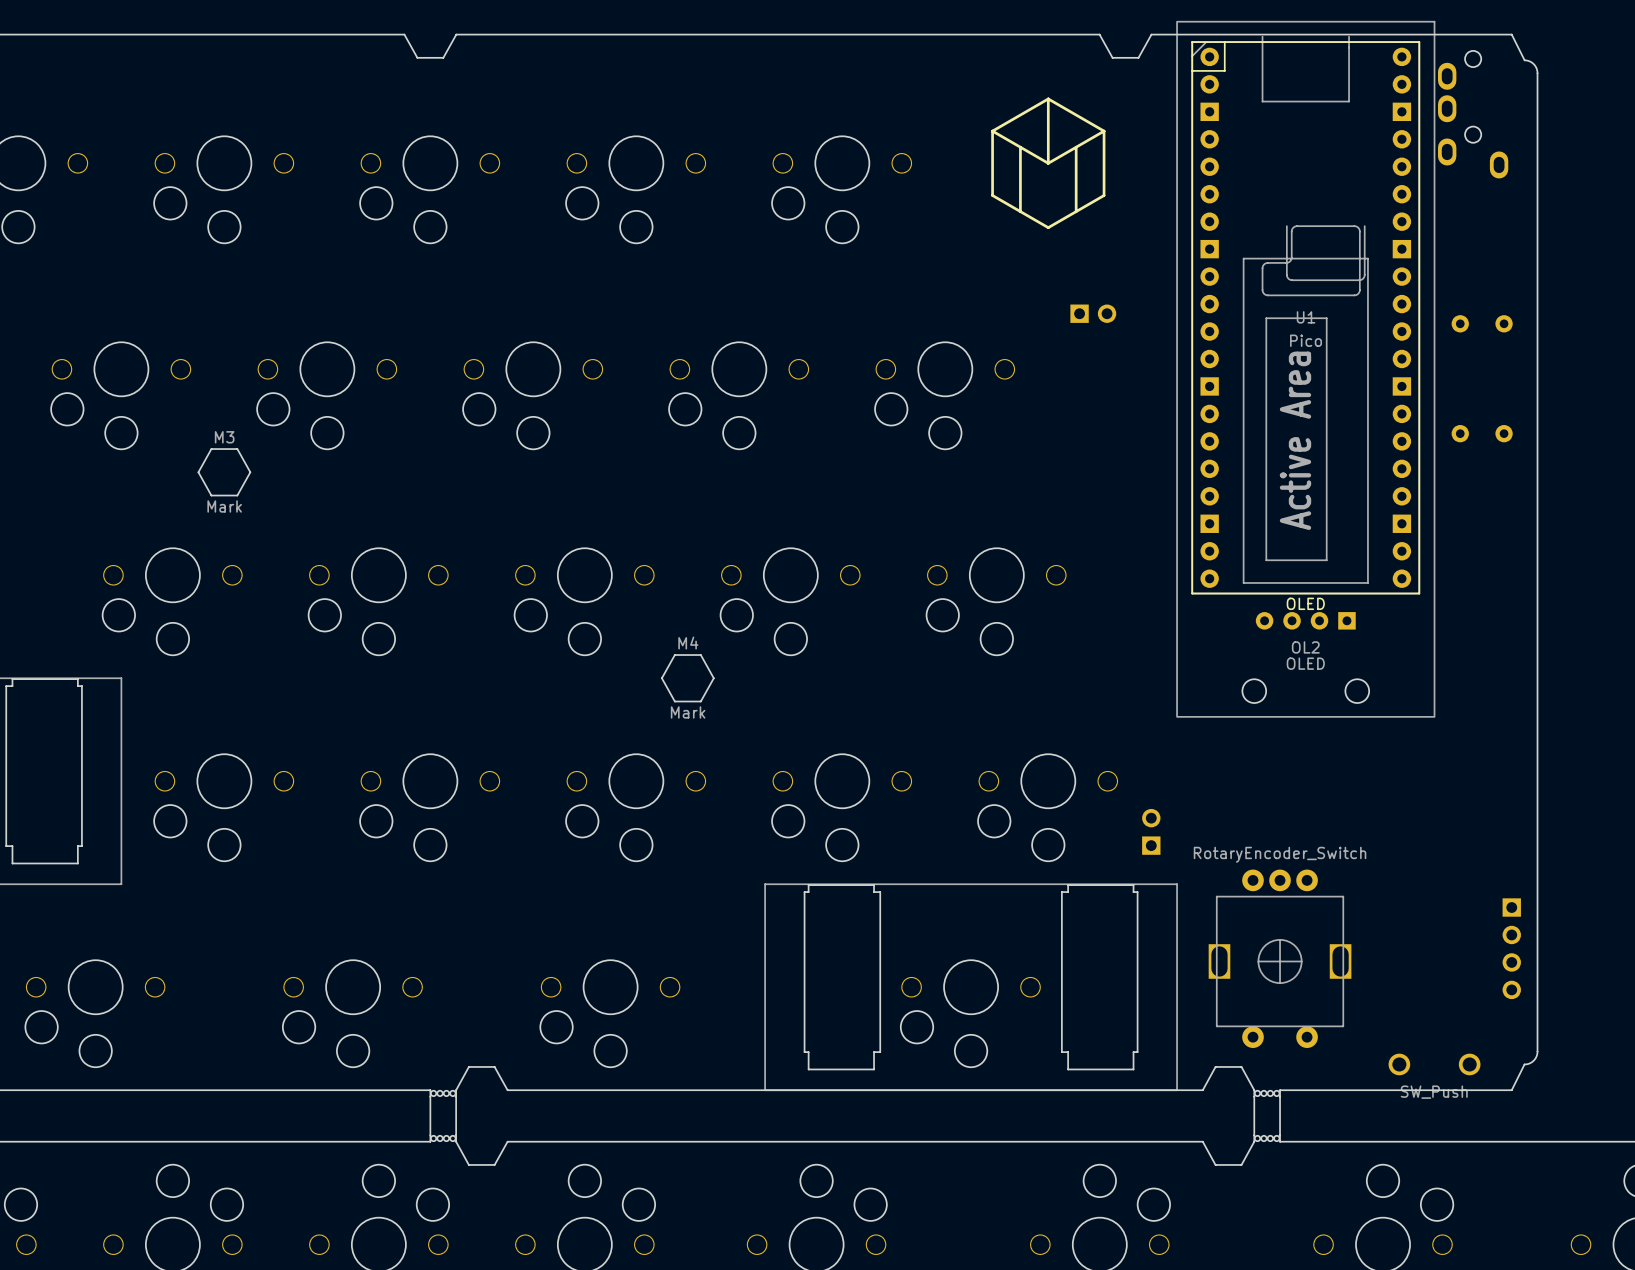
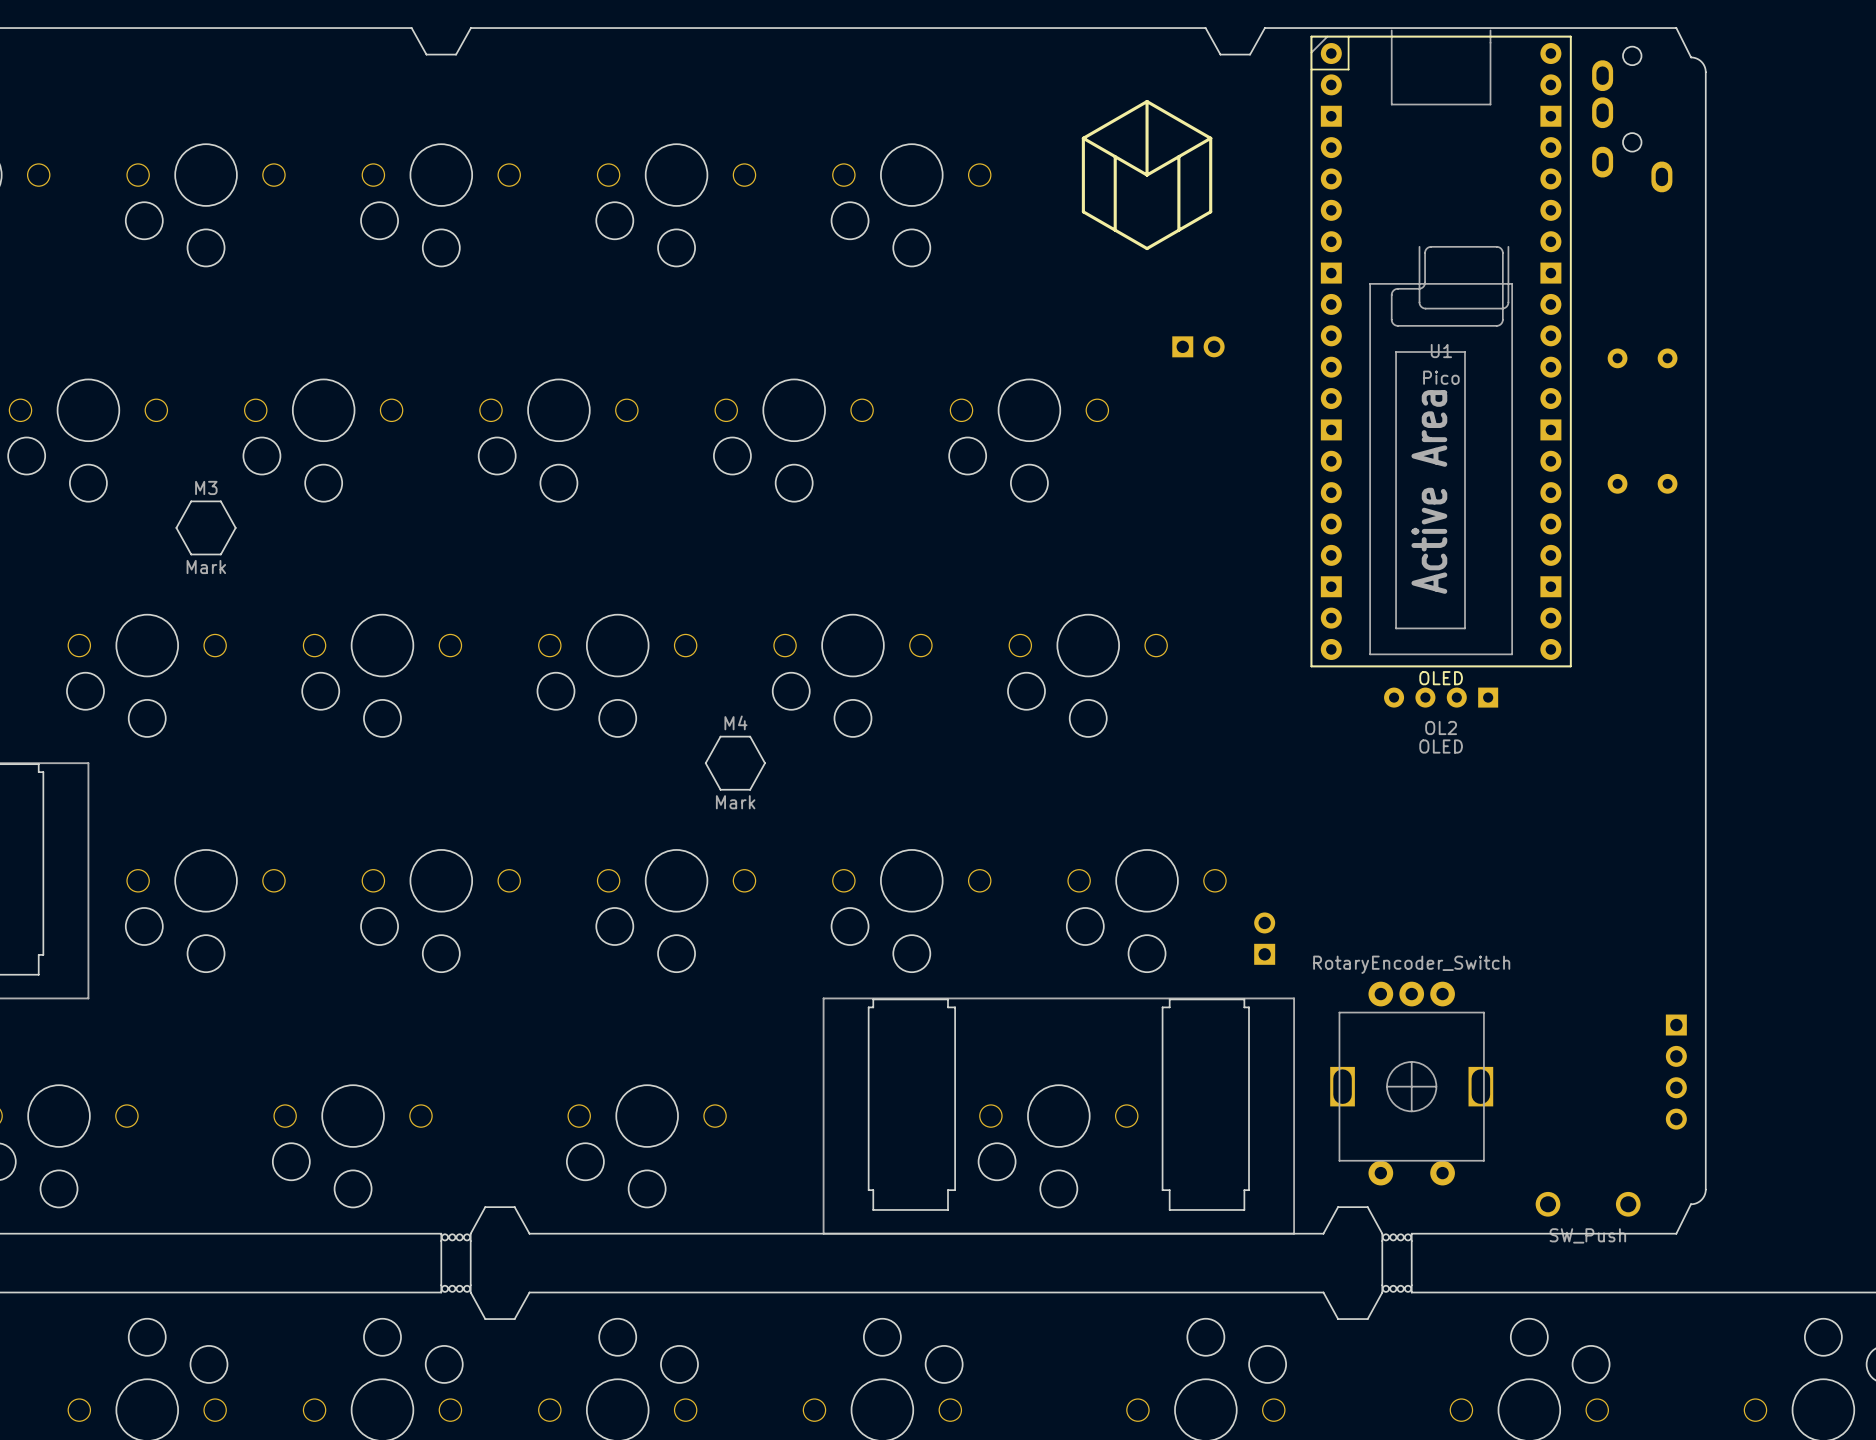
part: (1305, 369) -> none

